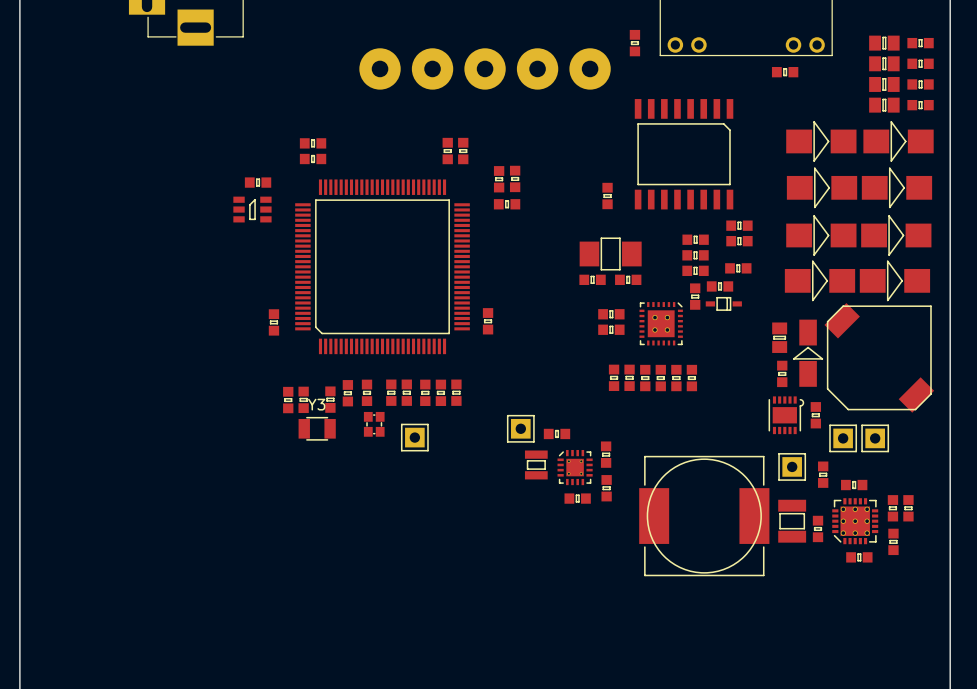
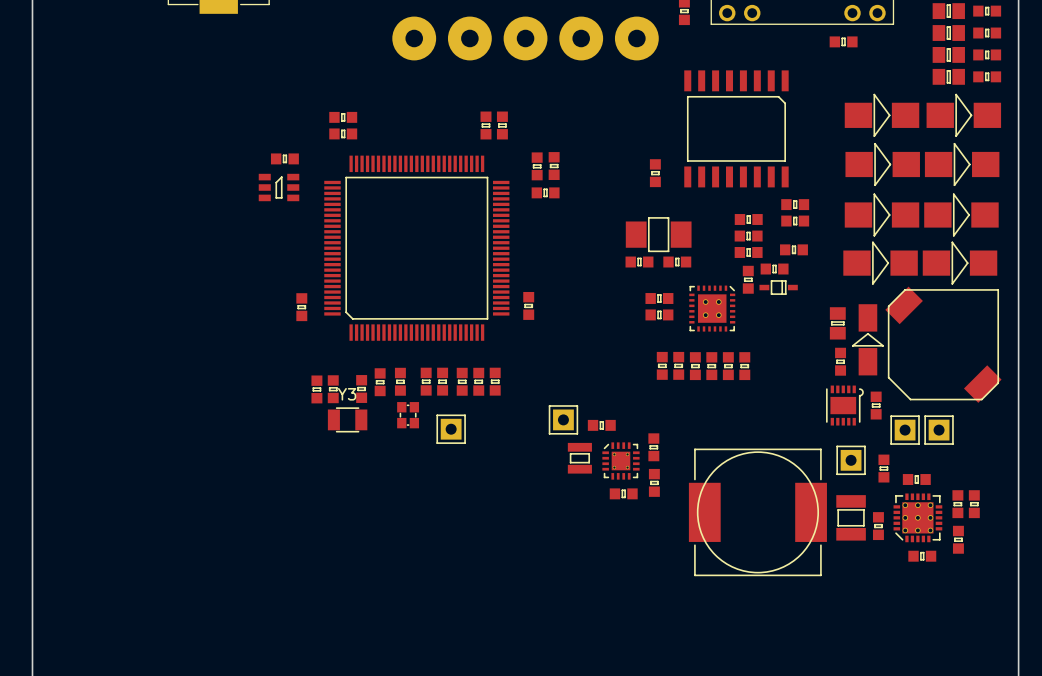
part: (515, 178) -> none
part: (499, 179) -> none
part: none -> (537, 166)
part: none -> (554, 166)
part: (507, 204) -> none
part: none -> (545, 192)

